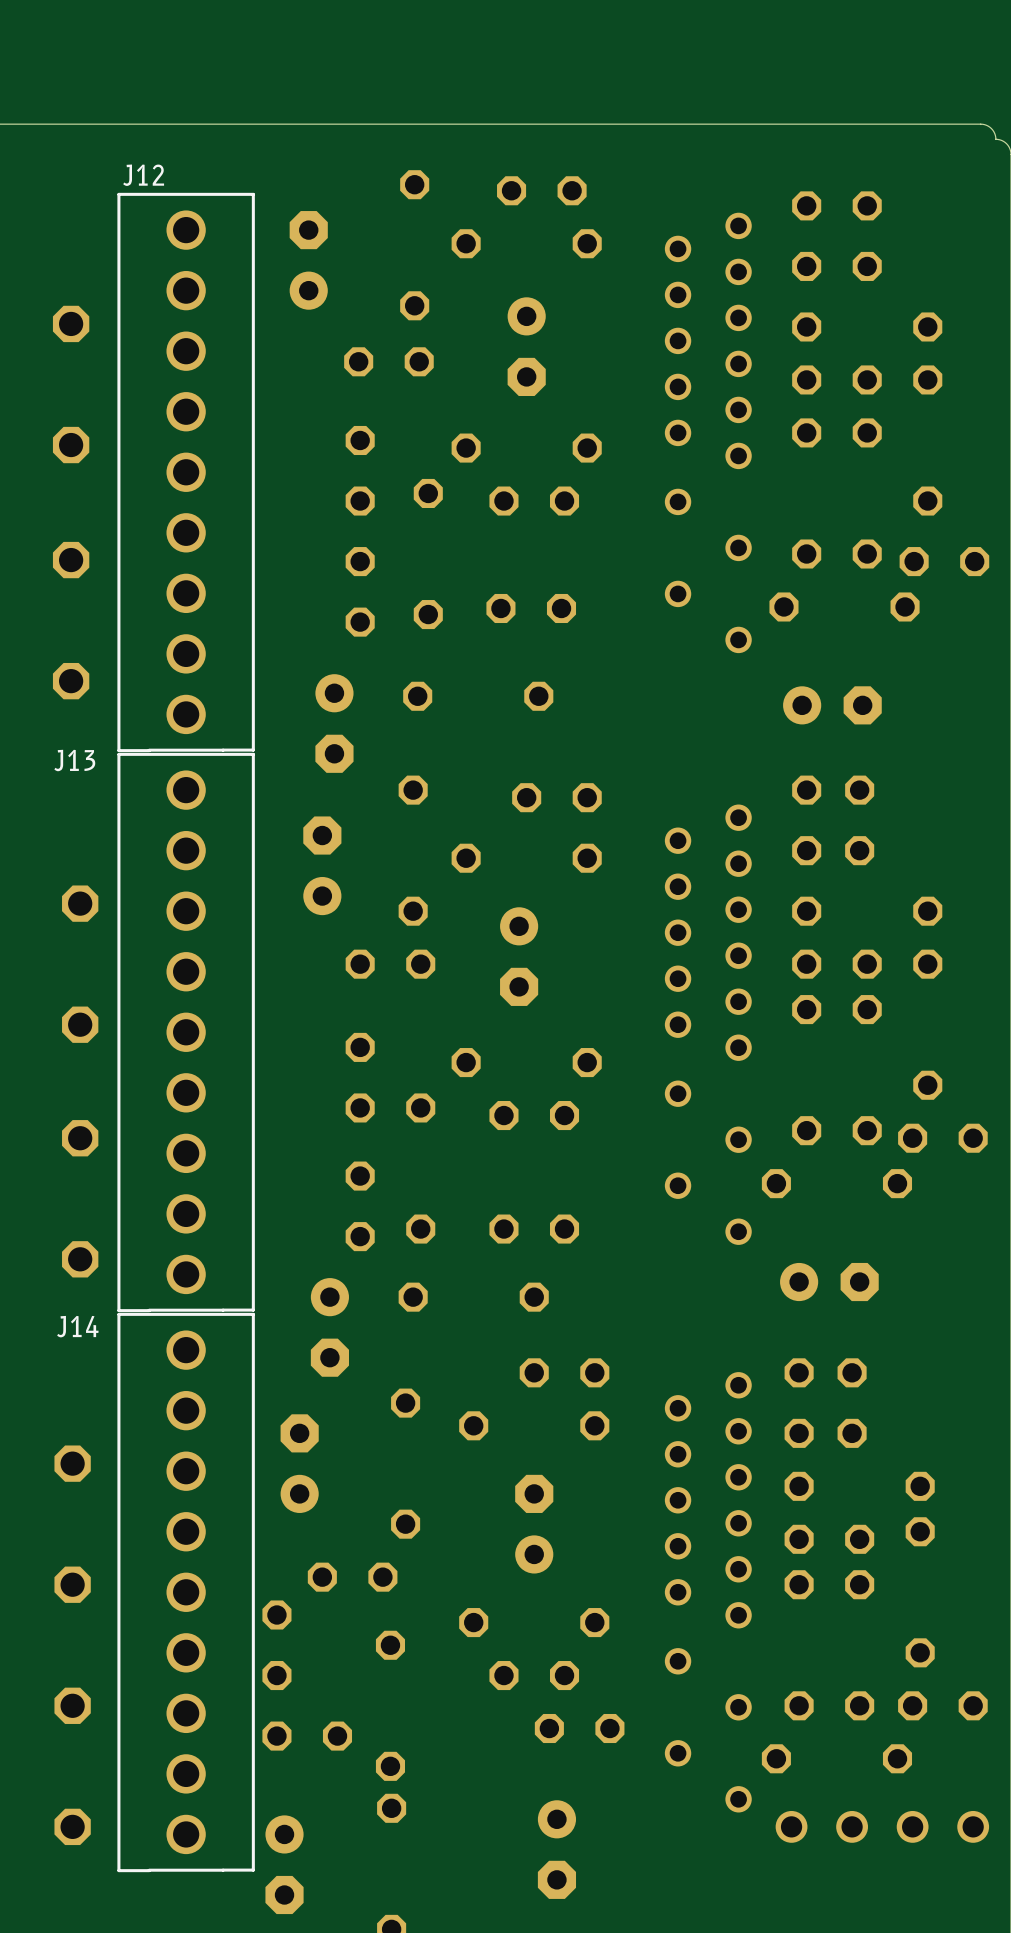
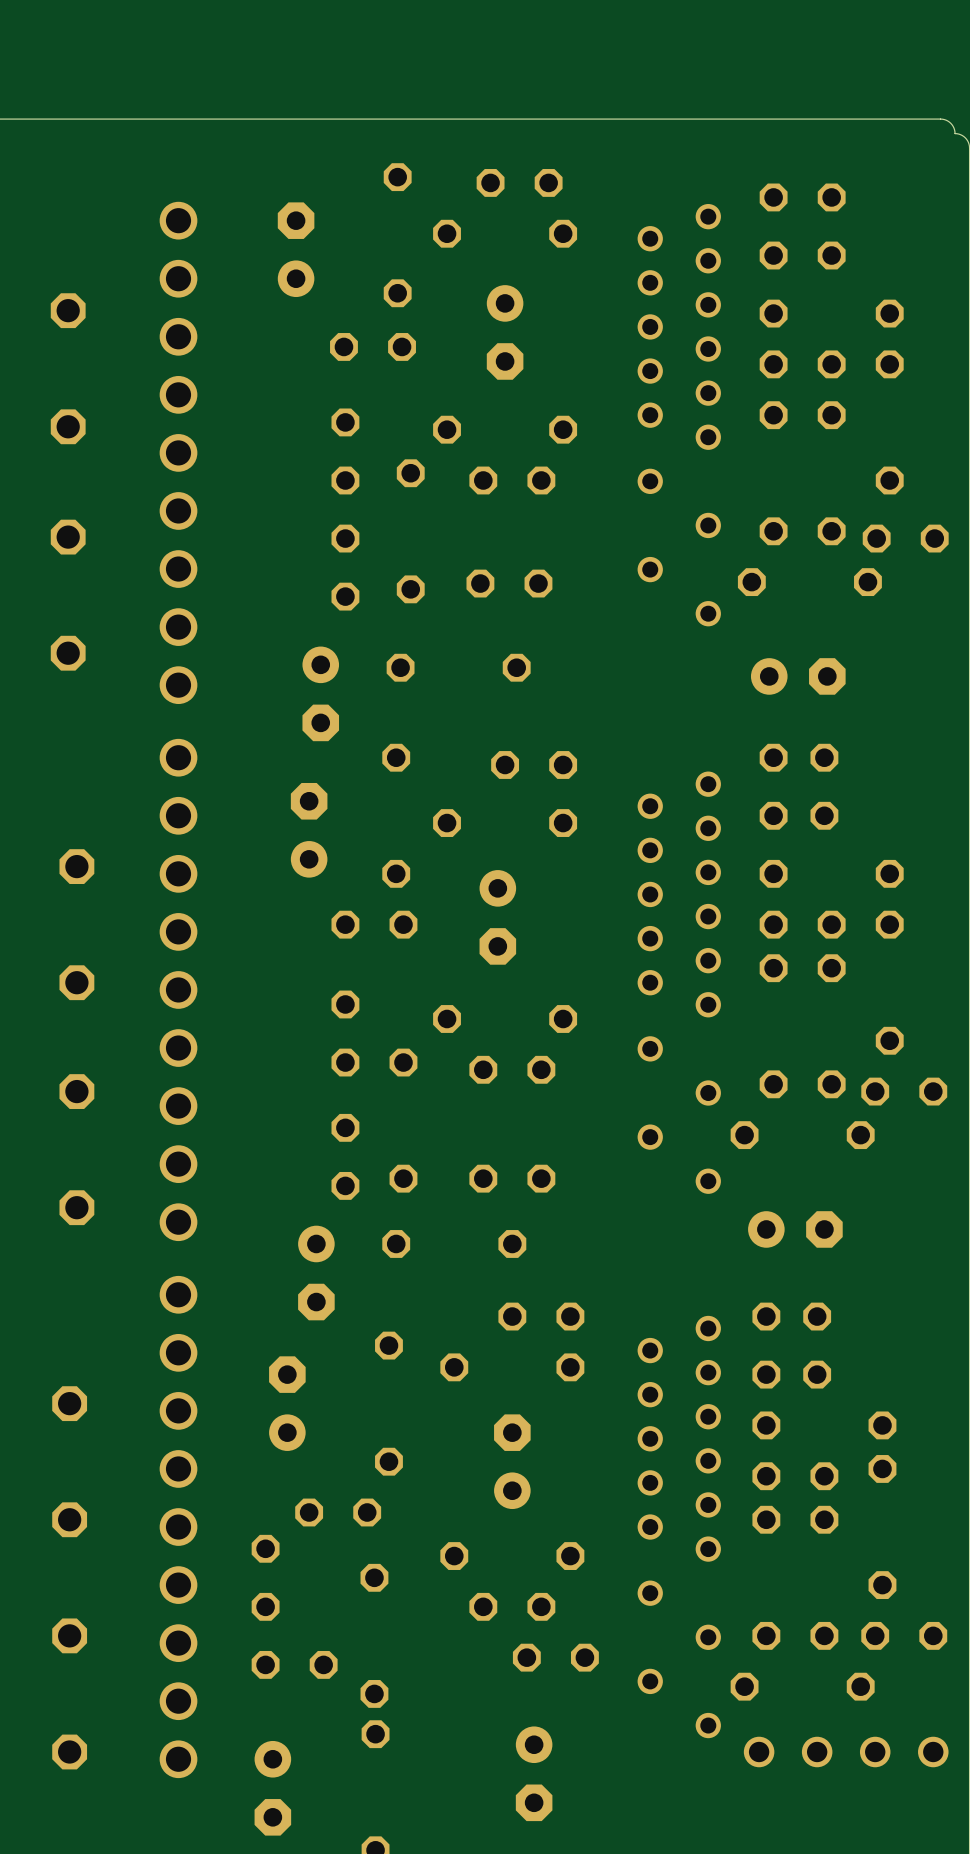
J12: (186, 472) -> none
J13: (186, 1032) -> none
J14: (186, 1592) -> none

